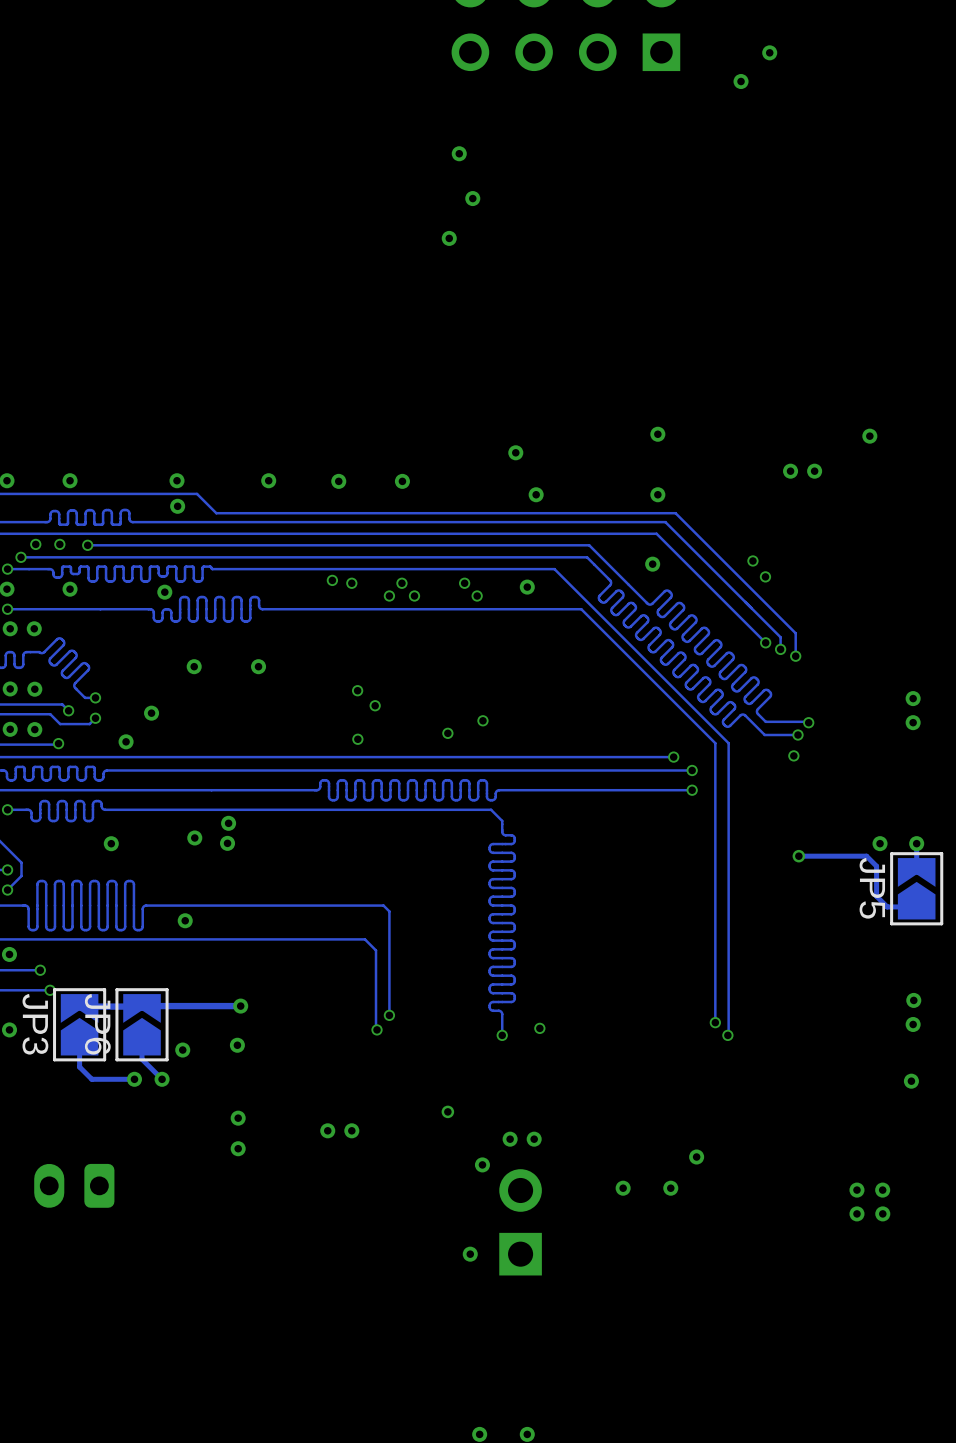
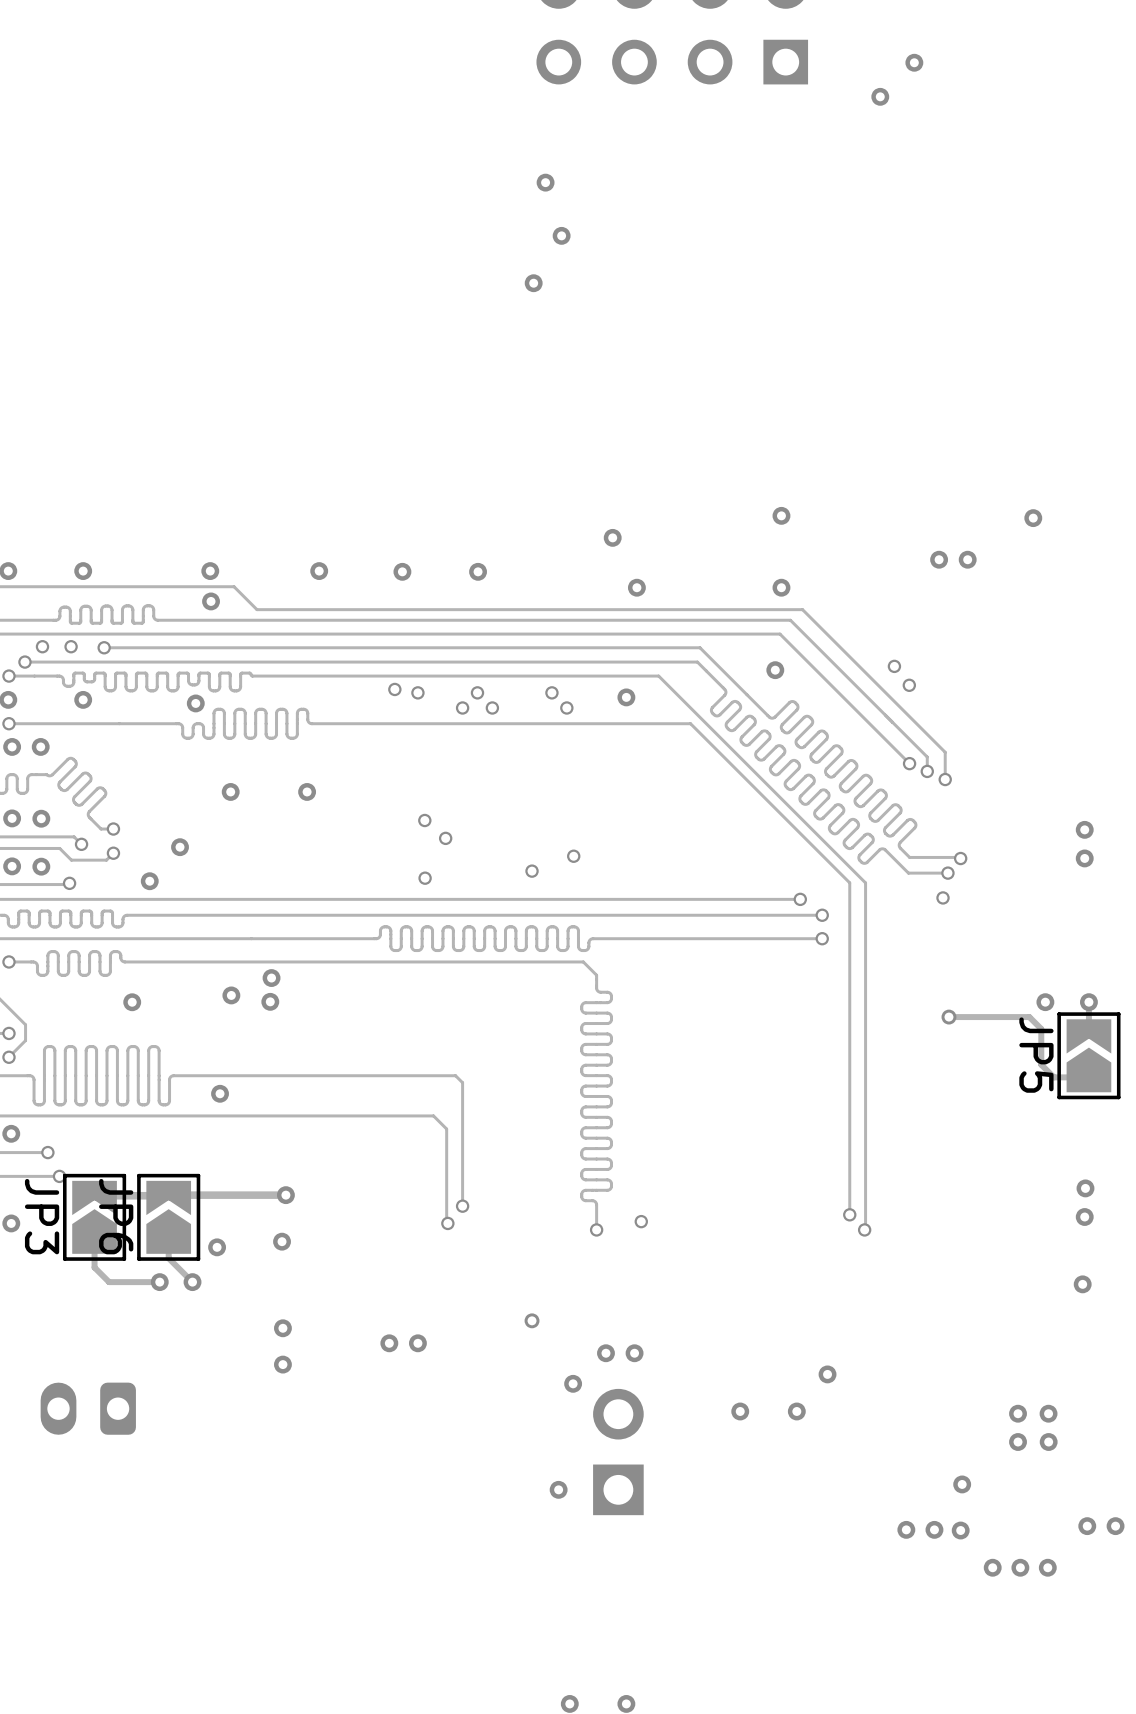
via: none -> (962, 1484)
via: none -> (1087, 1526)
via: none -> (1115, 1526)
via: none -> (906, 1529)
via: none -> (934, 1529)
via: none -> (960, 1530)
via: none -> (992, 1567)
via: none -> (1020, 1567)
via: none -> (1047, 1567)

